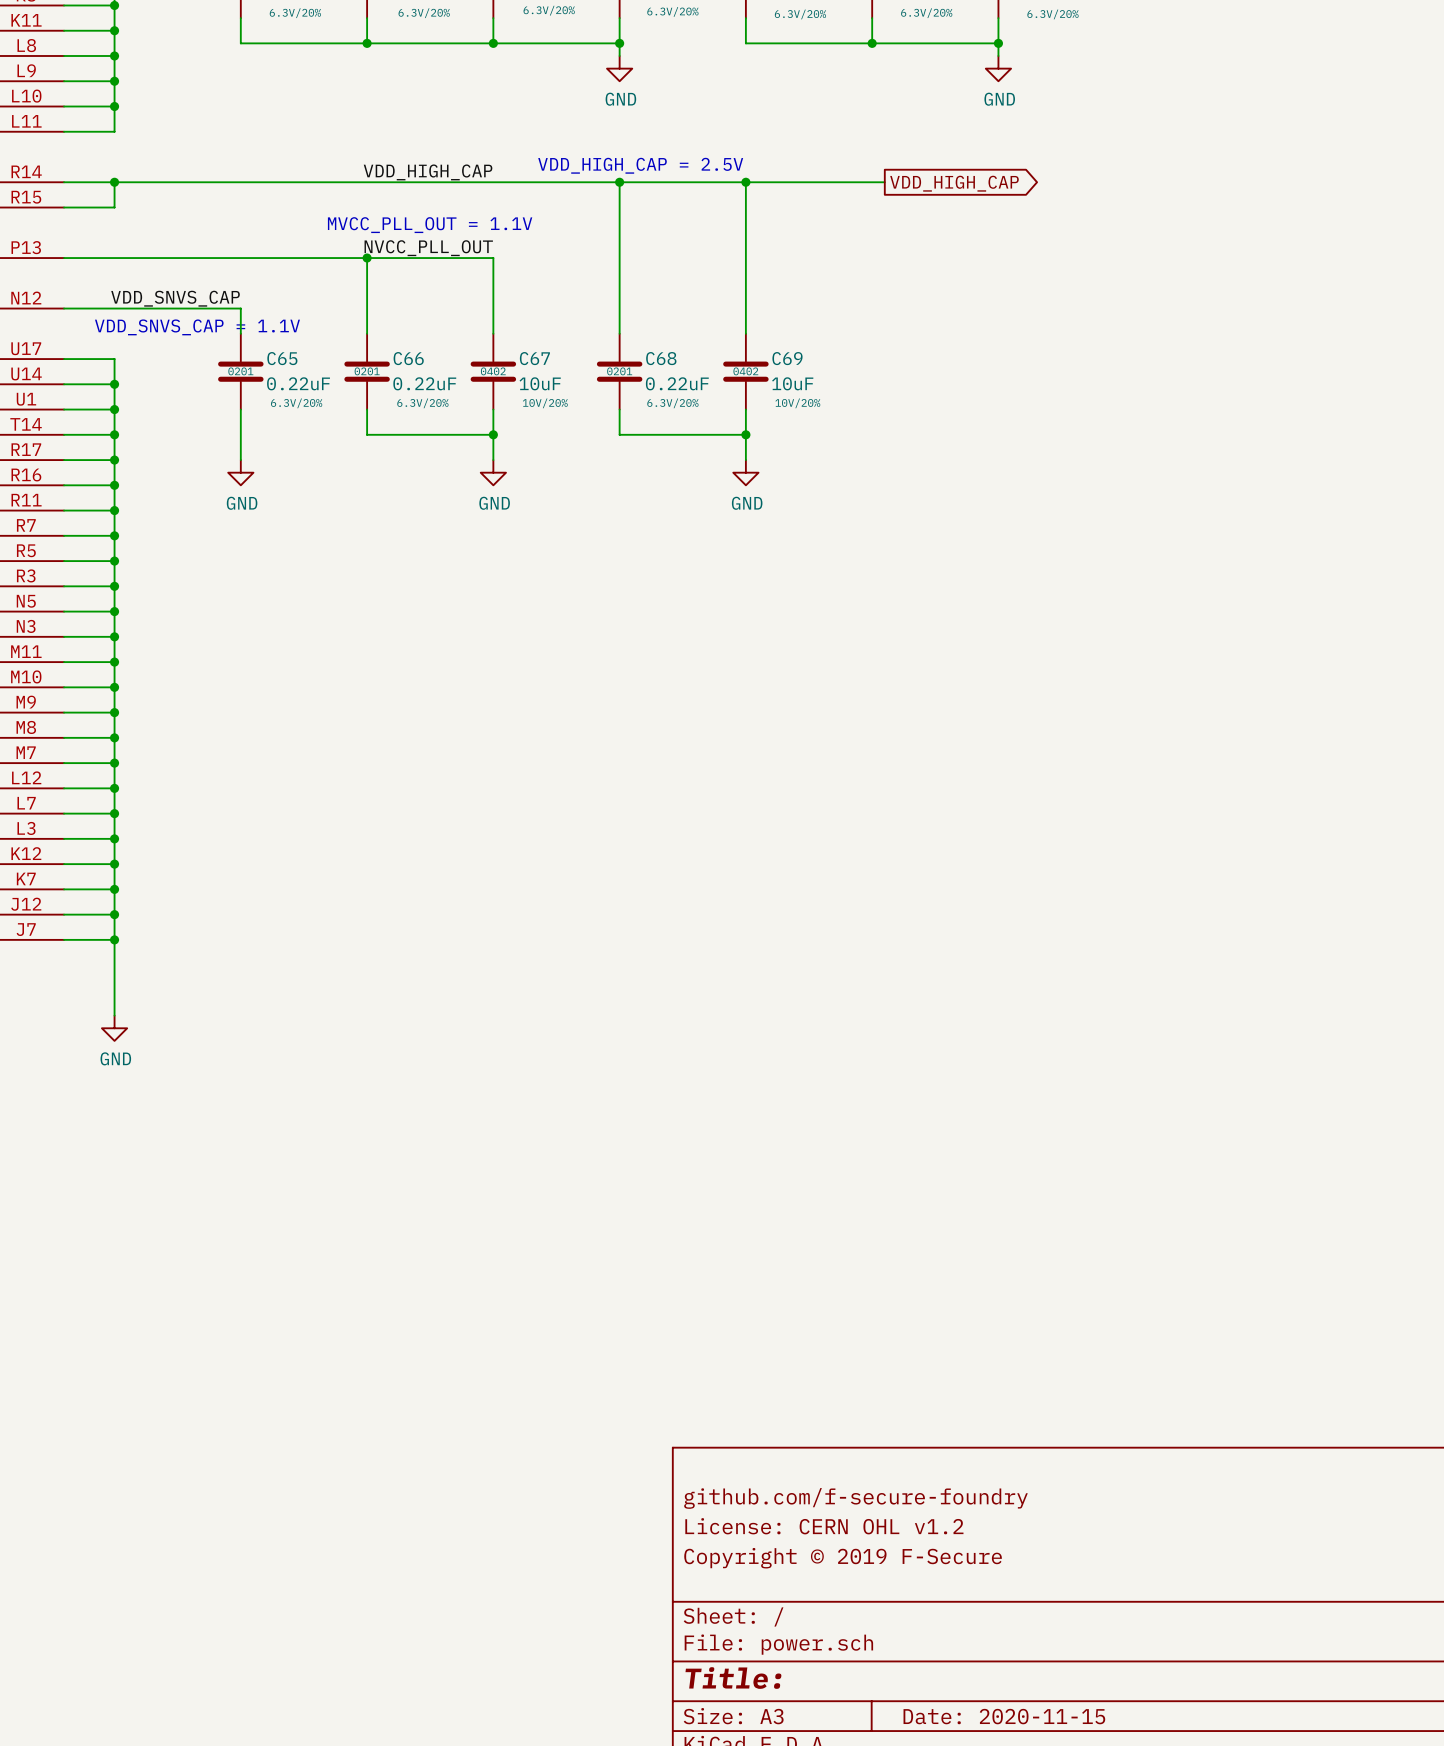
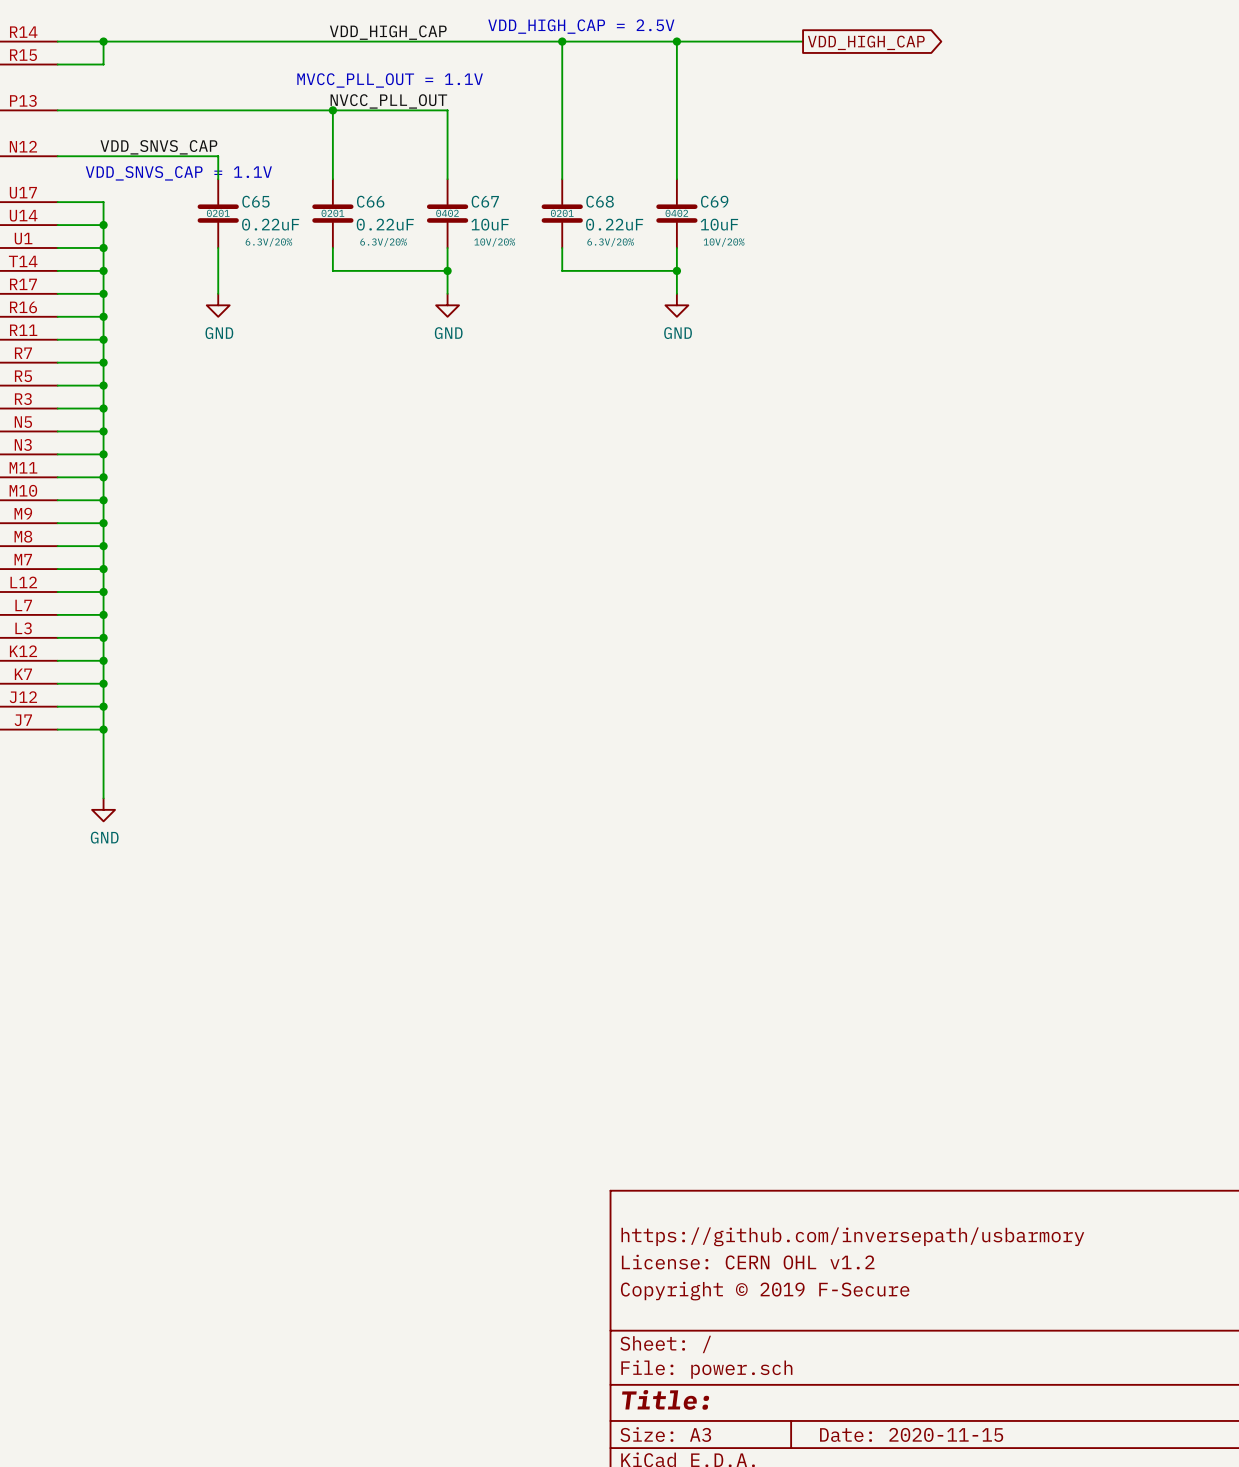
title block: github.com/f-secure-foundry (855, 1498) -> https://github.com/inversepath/usbarmory (852, 1236)

